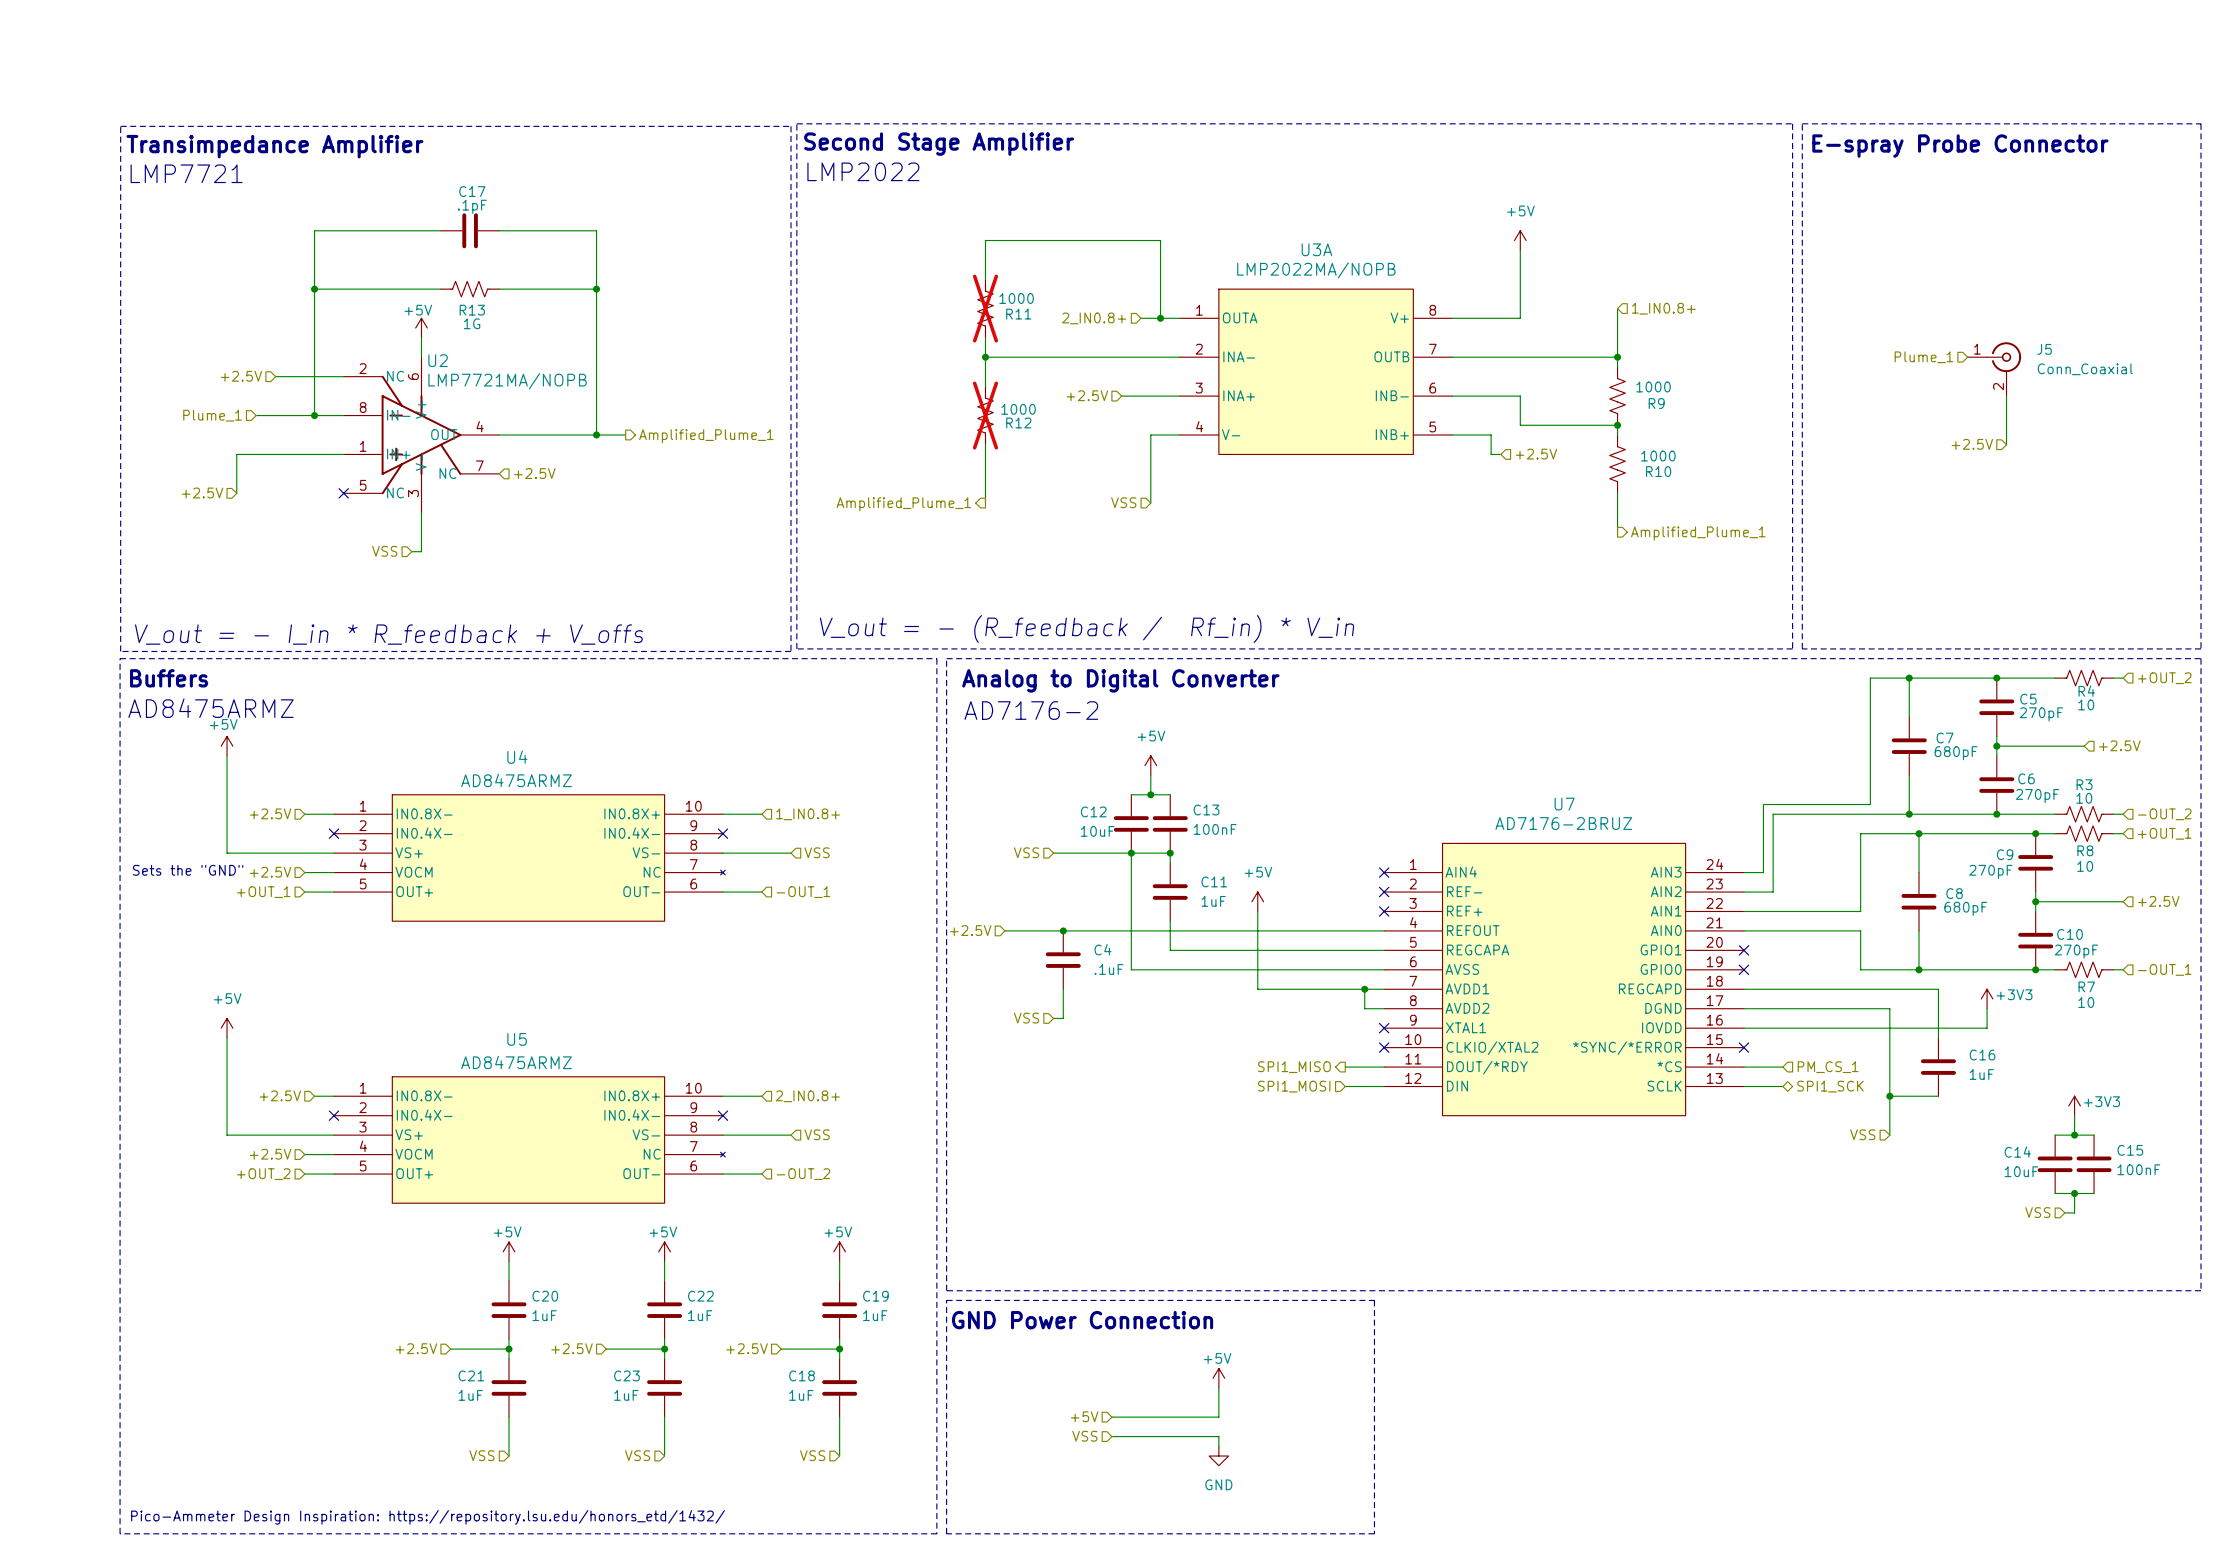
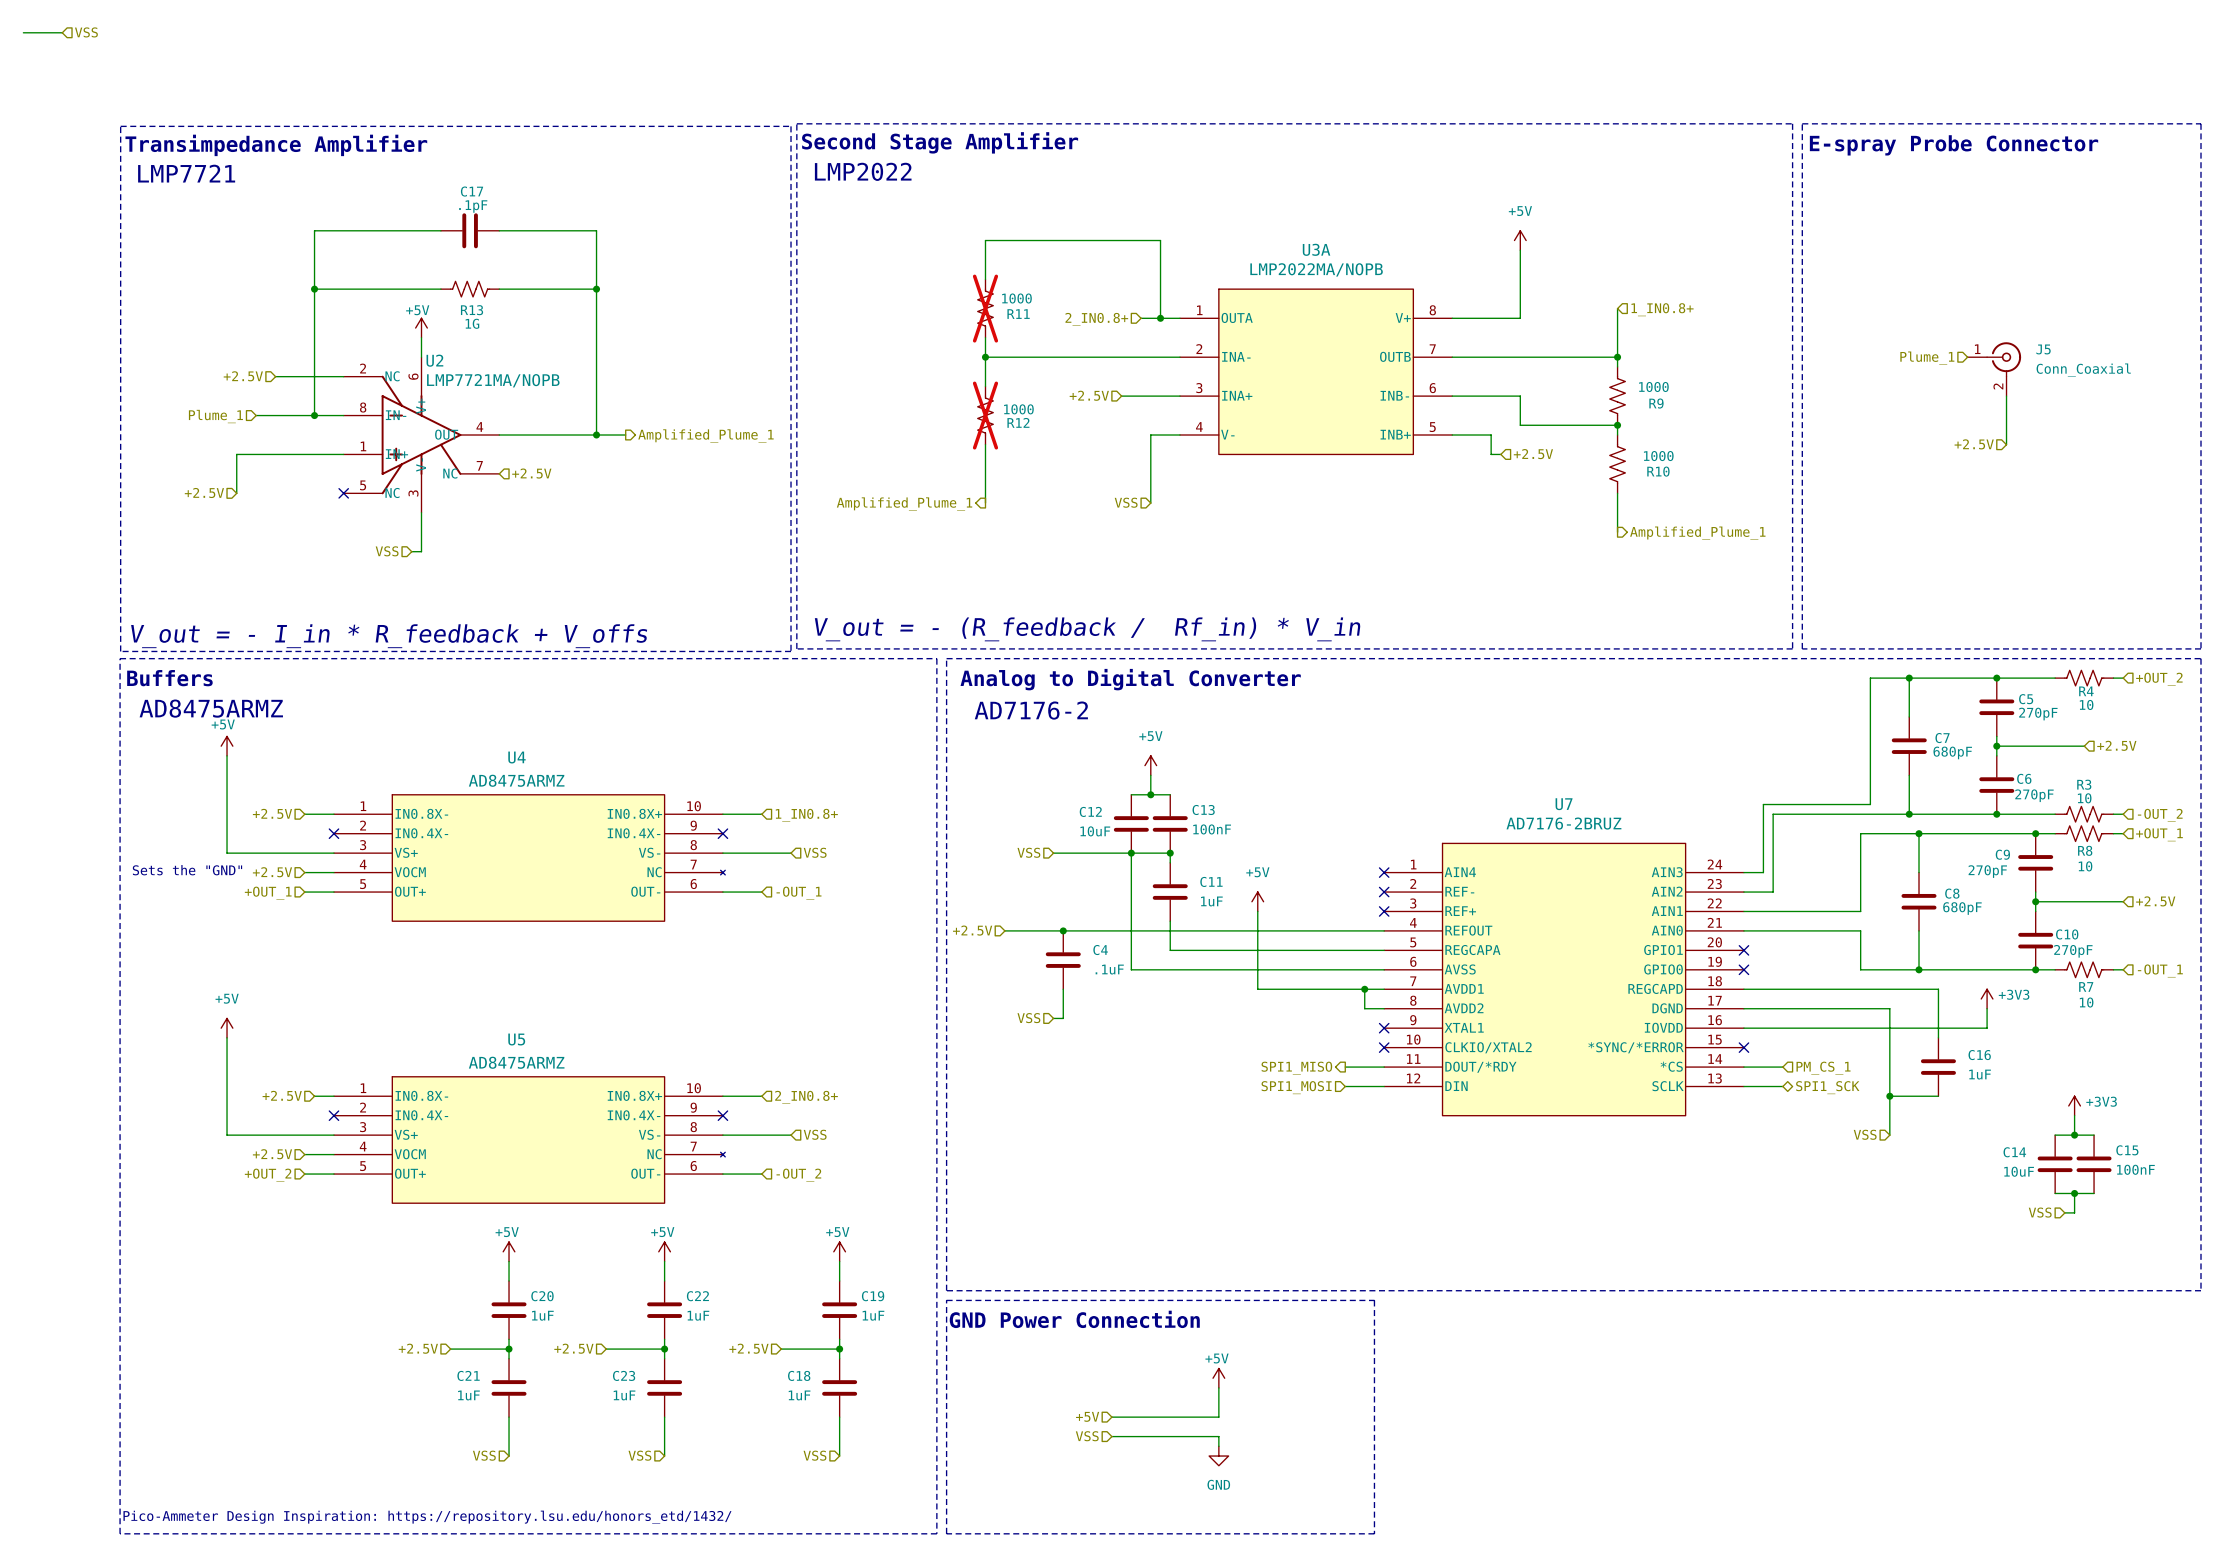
wire: none -> (23, 32) (62, 32)
hierarchical label: none -> VSS (86, 32)

